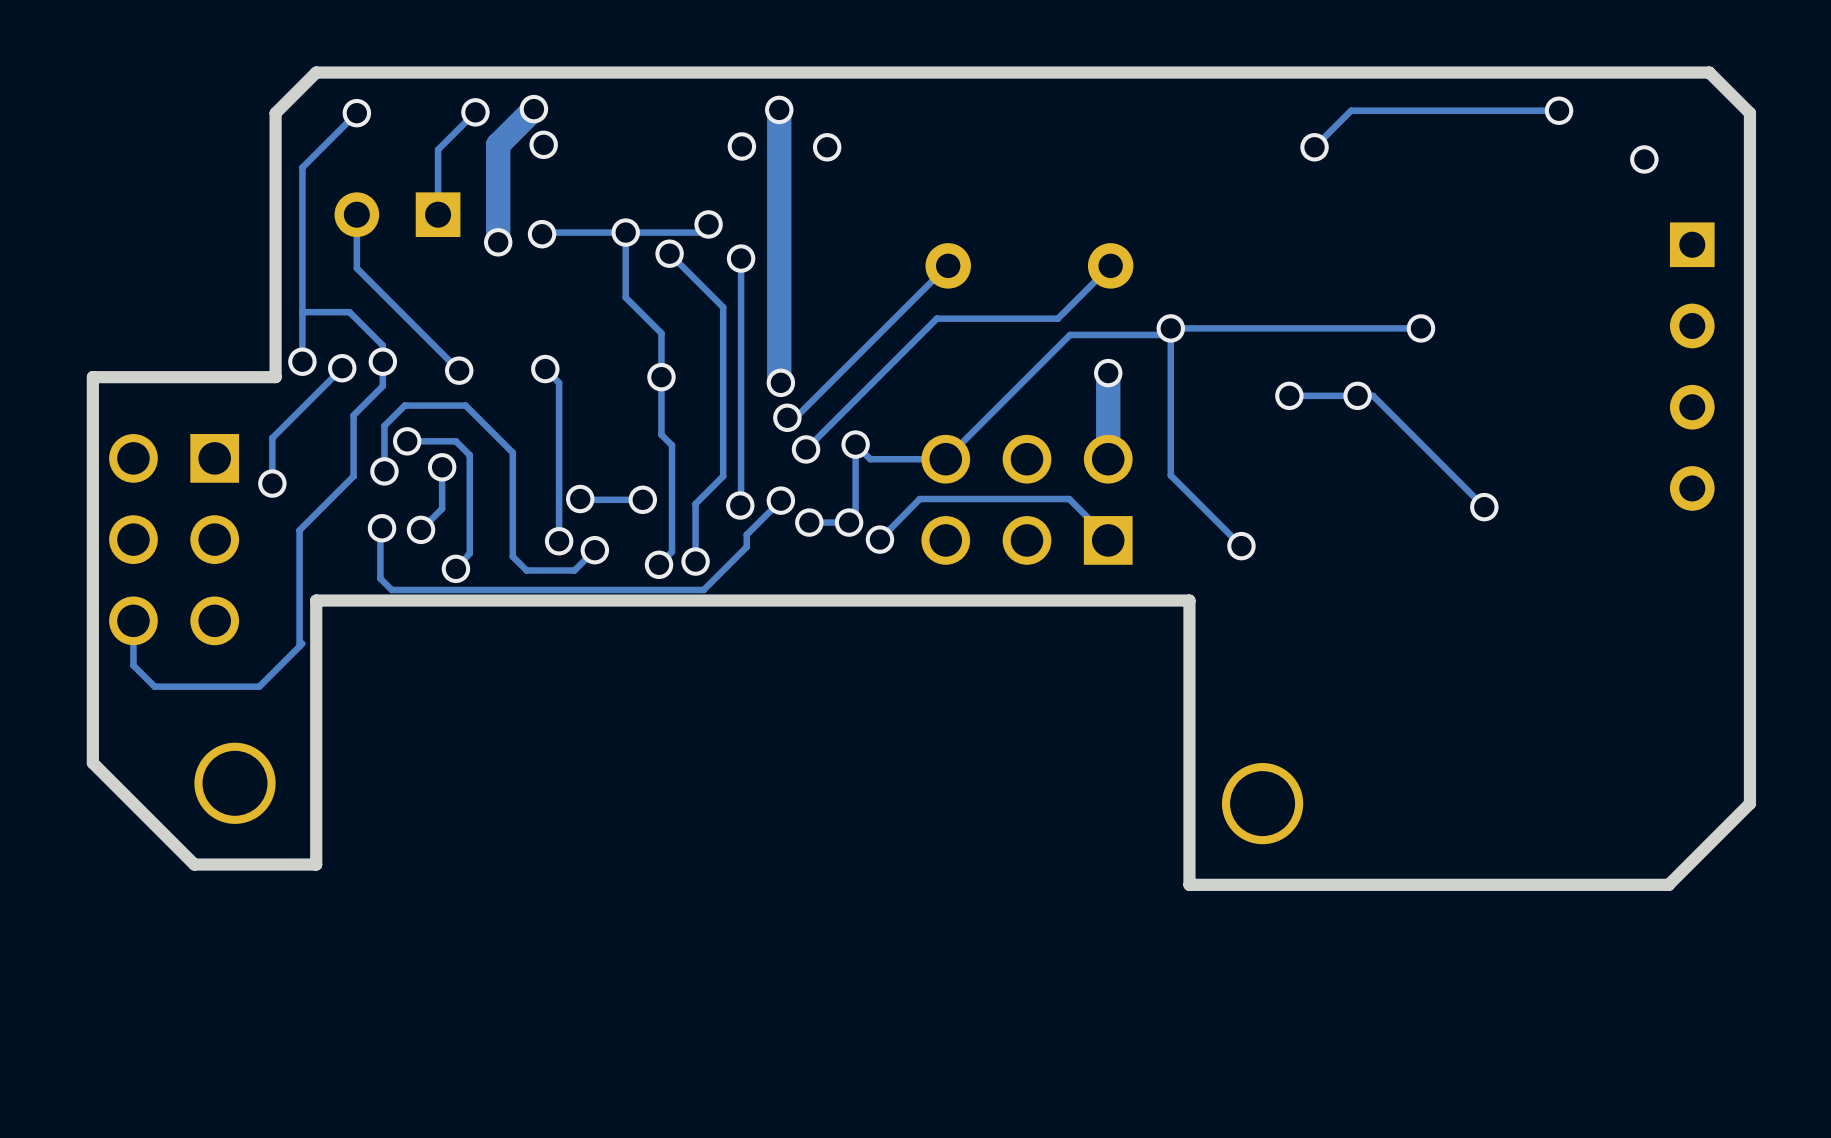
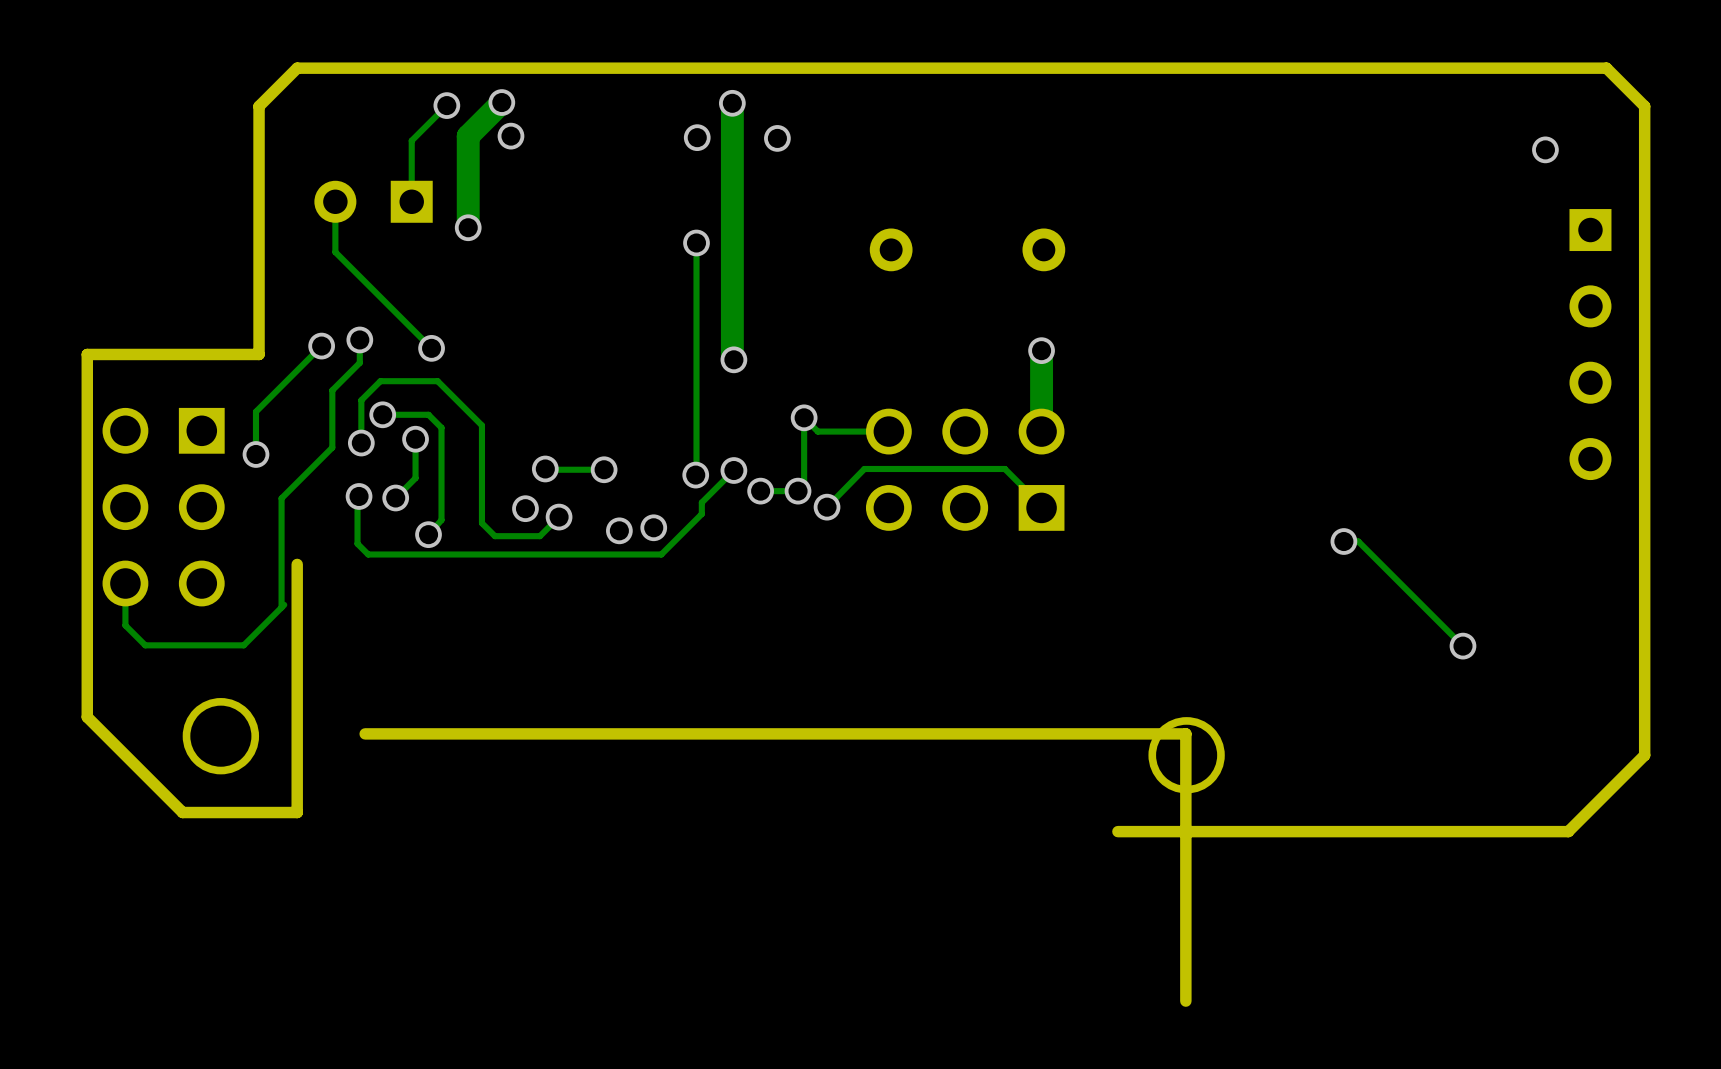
track: (1559, 110) (1351, 110) (1314, 147) -> none
via: (1559, 110) -> none
track: (356, 113) (302, 167) (302, 361) -> none
via: (356, 113) -> none
via: (1314, 147) -> none
track: (708, 224) (700, 232) (543, 232) (542, 234) -> none
via: (708, 224) -> none
track: (625, 232) (625, 297) (661, 333) (661, 434) (672, 445) (672, 551) (659, 564) -> none
via: (625, 232) -> none
via: (542, 234) -> none
track: (669, 253) (723, 307) (723, 476) (695, 503) (695, 561) -> none
via: (669, 253) -> none
track: (948, 265) (795, 417) (787, 417) -> none
track: (1110, 265) (1057, 318) (936, 318) (806, 449) -> none
track: (302, 312) (349, 312) (382, 345) (382, 361) -> none
track: (1170, 328) (1170, 475) (1241, 546) -> none
track: (1170, 328) (1164, 334) (1070, 334) (945, 459) -> none
via: (1170, 328) -> none
track: (1420, 328) (1170, 328) -> none
via: (1420, 328) -> none
via: (302, 361) -> none
track: (545, 369) (559, 382) (559, 541) -> none
via: (545, 369) -> none
via: (661, 377) -> none
track: (1289, 395) (1373, 395) (1484, 507) -> none
via: (1289, 395) -> none
via: (1357, 395) -> none
via: (787, 417) -> none
via: (806, 449) -> none
via position: (1484, 507) -> (1343, 541)
via: (1241, 546) -> none
track: none -> (1343, 541) (1358, 541) (1462, 646)
board edge: (316, 600) (1189, 600) (1189, 884) -> (365, 733) (1185, 733) (1185, 1001)
via: none -> (1462, 646)

